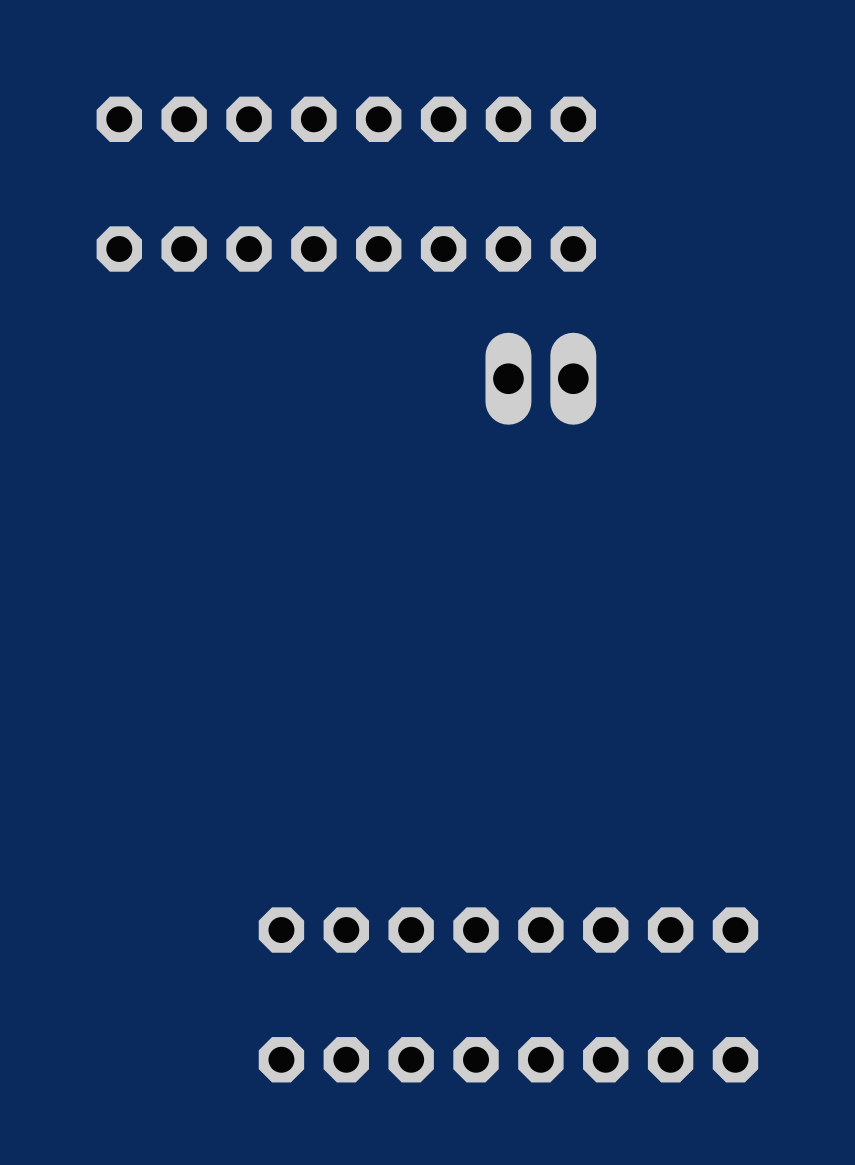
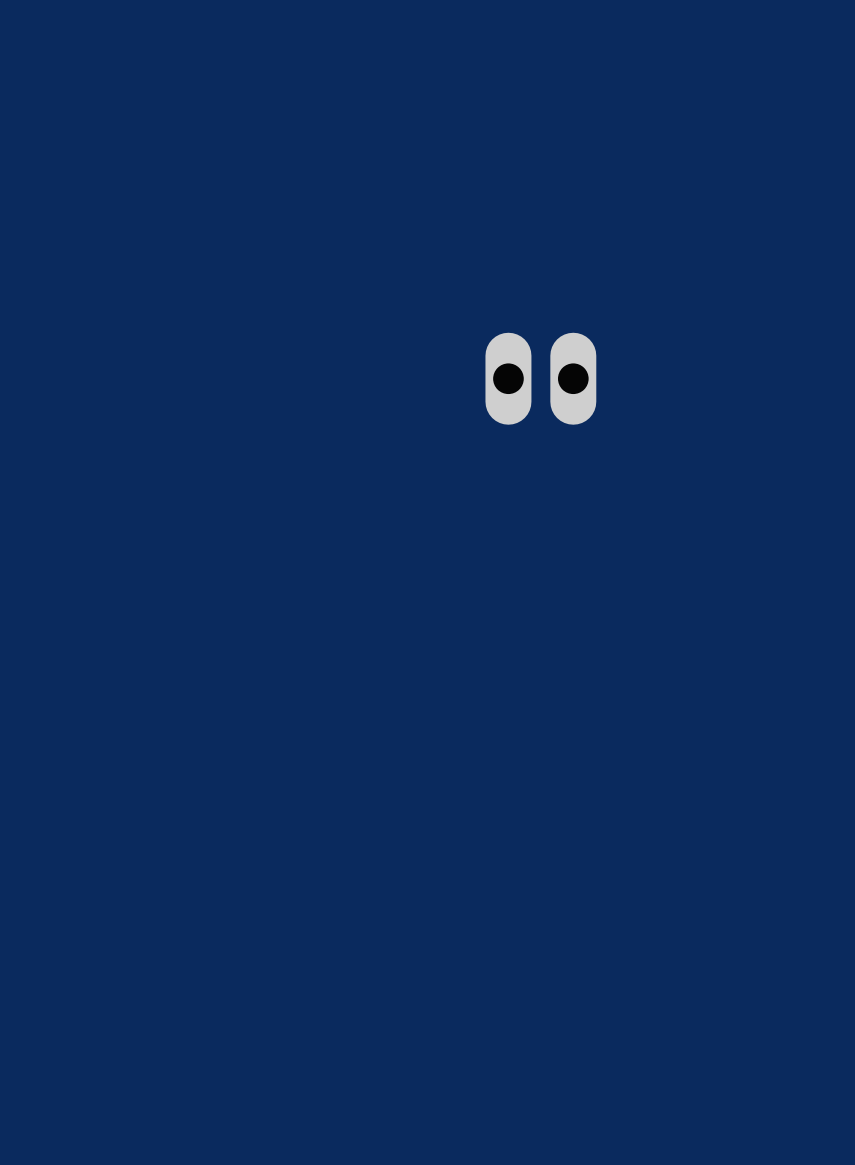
part: (346, 119) -> none
part: (346, 249) -> none
part: (508, 930) -> none
part: (508, 1059) -> none

